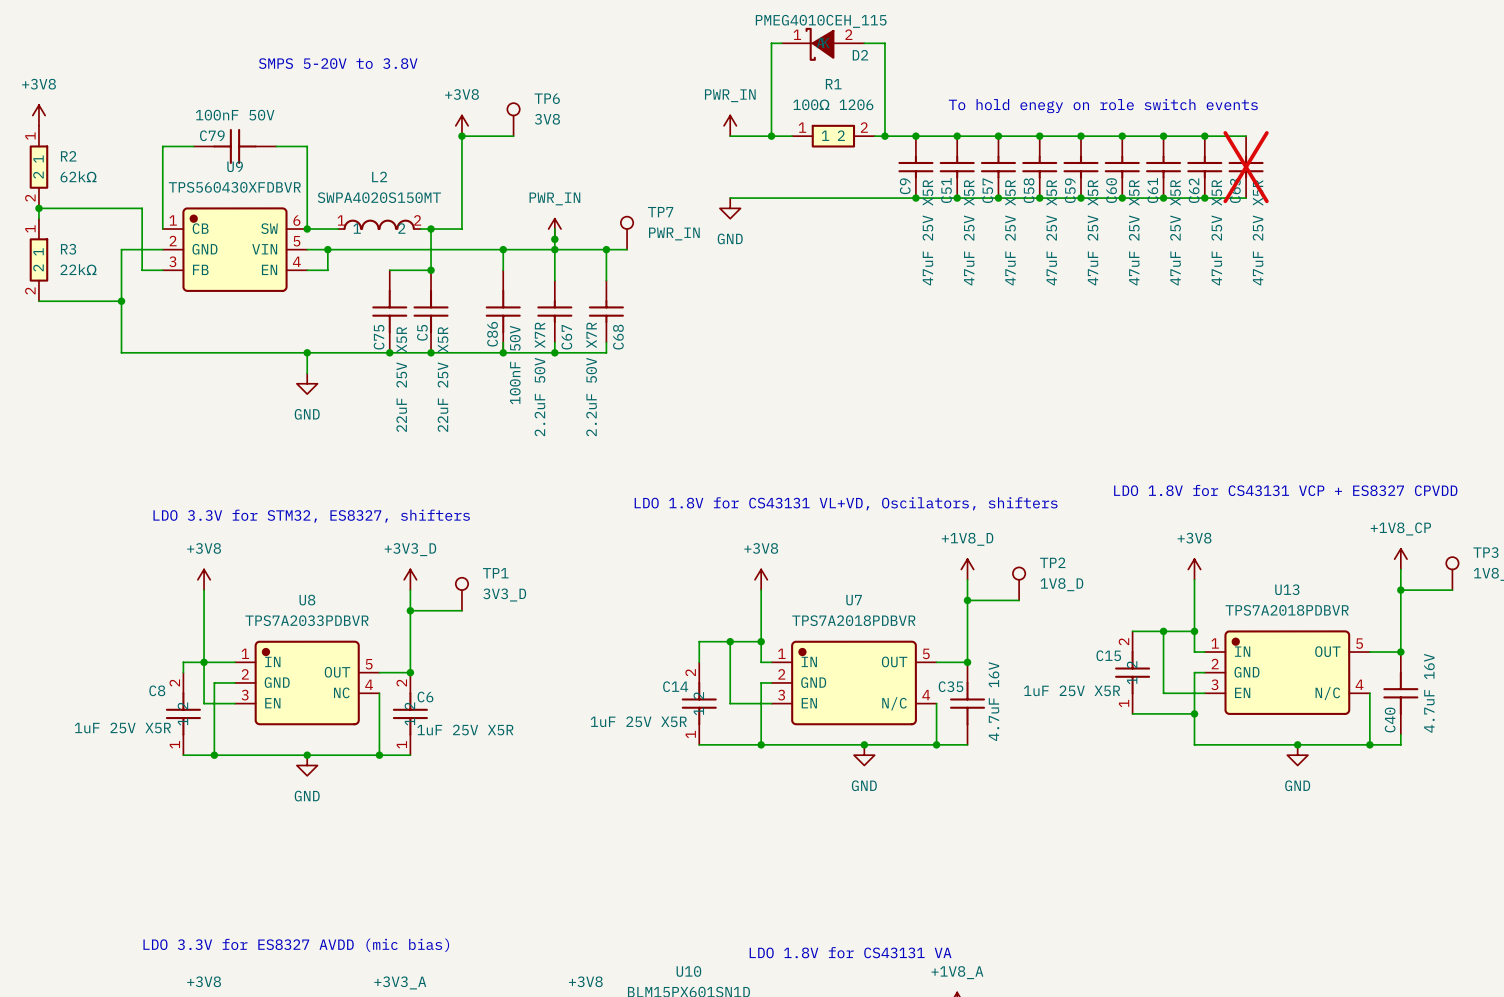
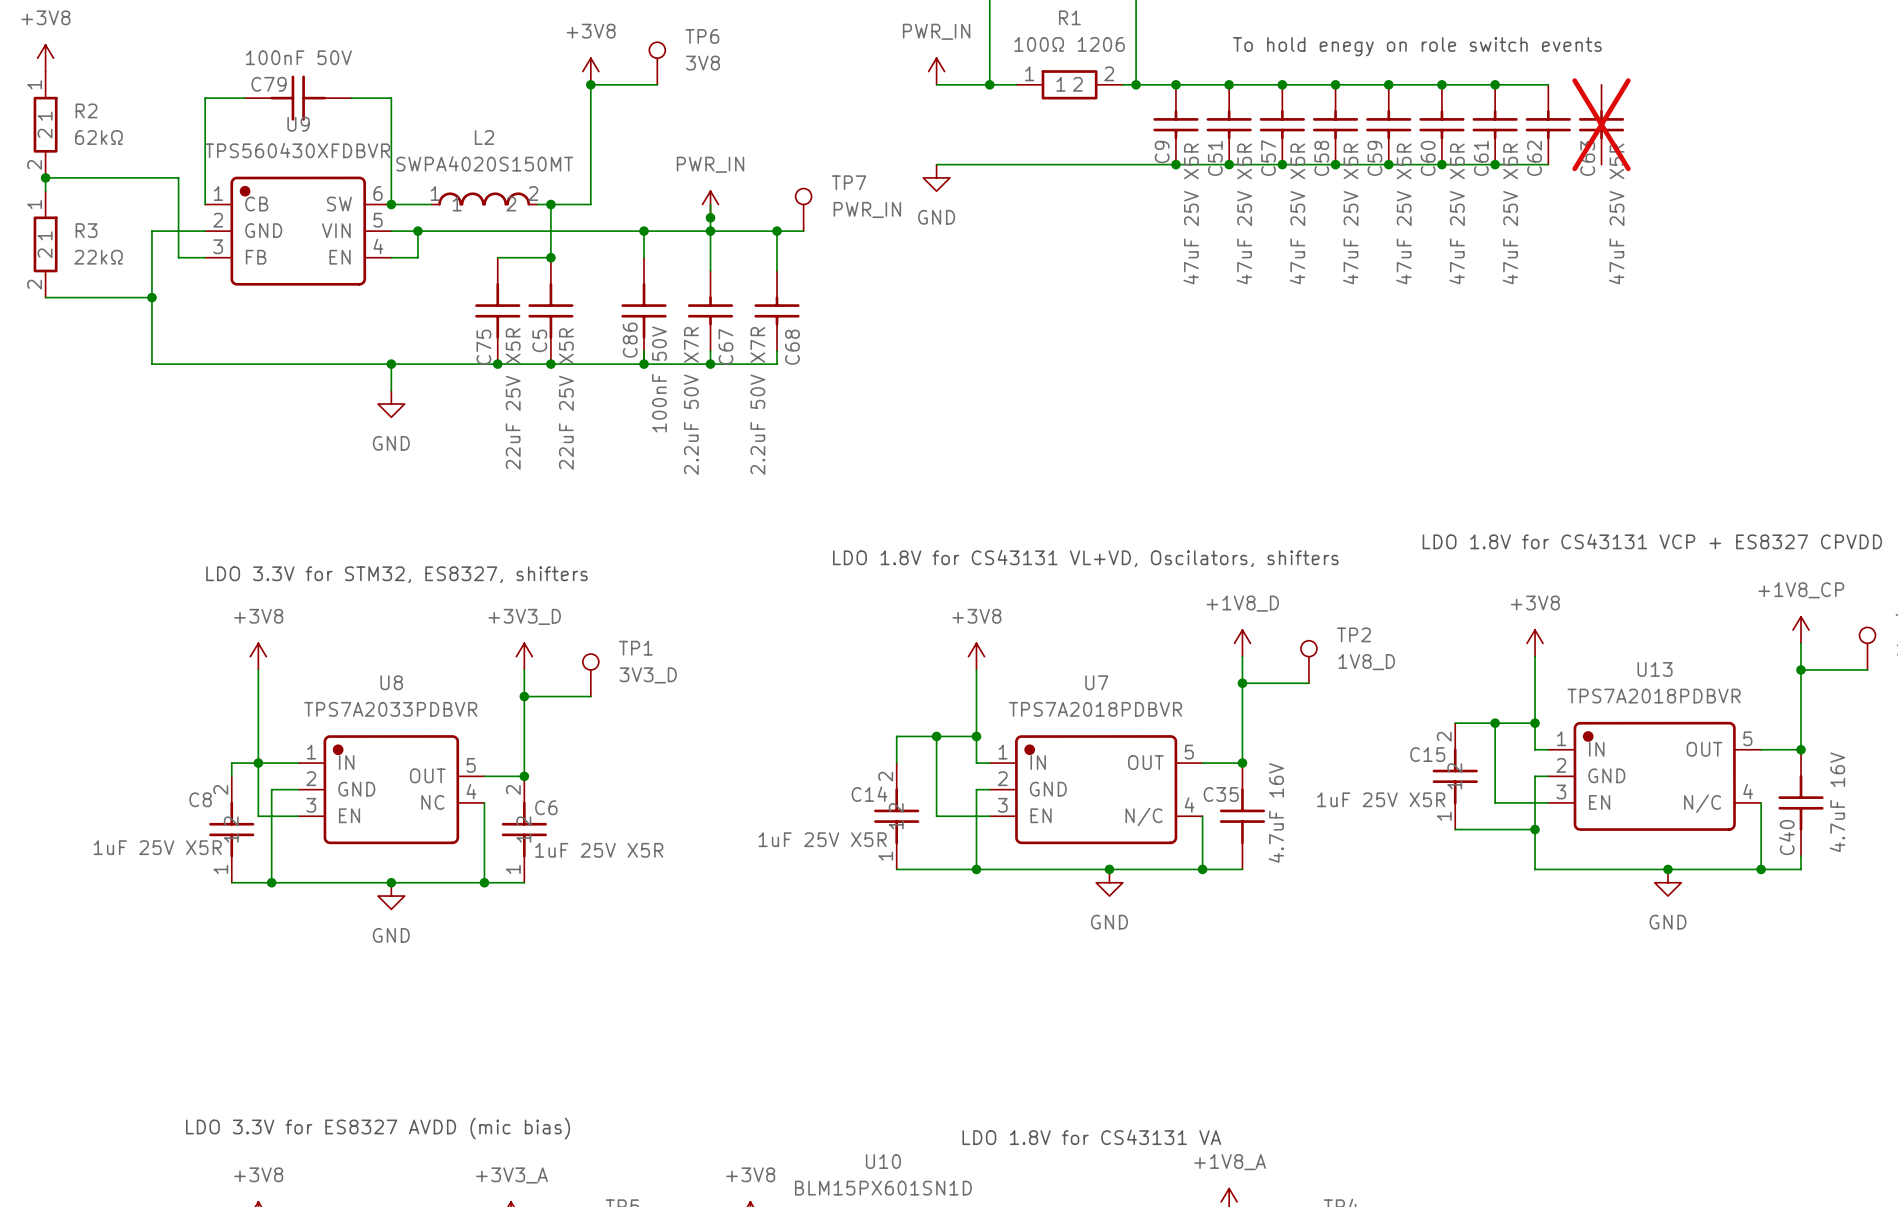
wire: (1204, 136) (1246, 136) -> none
junction: (1204, 136) -> none
wire: (1204, 198) (1246, 198) -> none
junction: (1204, 198) -> none
C62 value: 47uF 25V X5R (1216, 232) -> none

